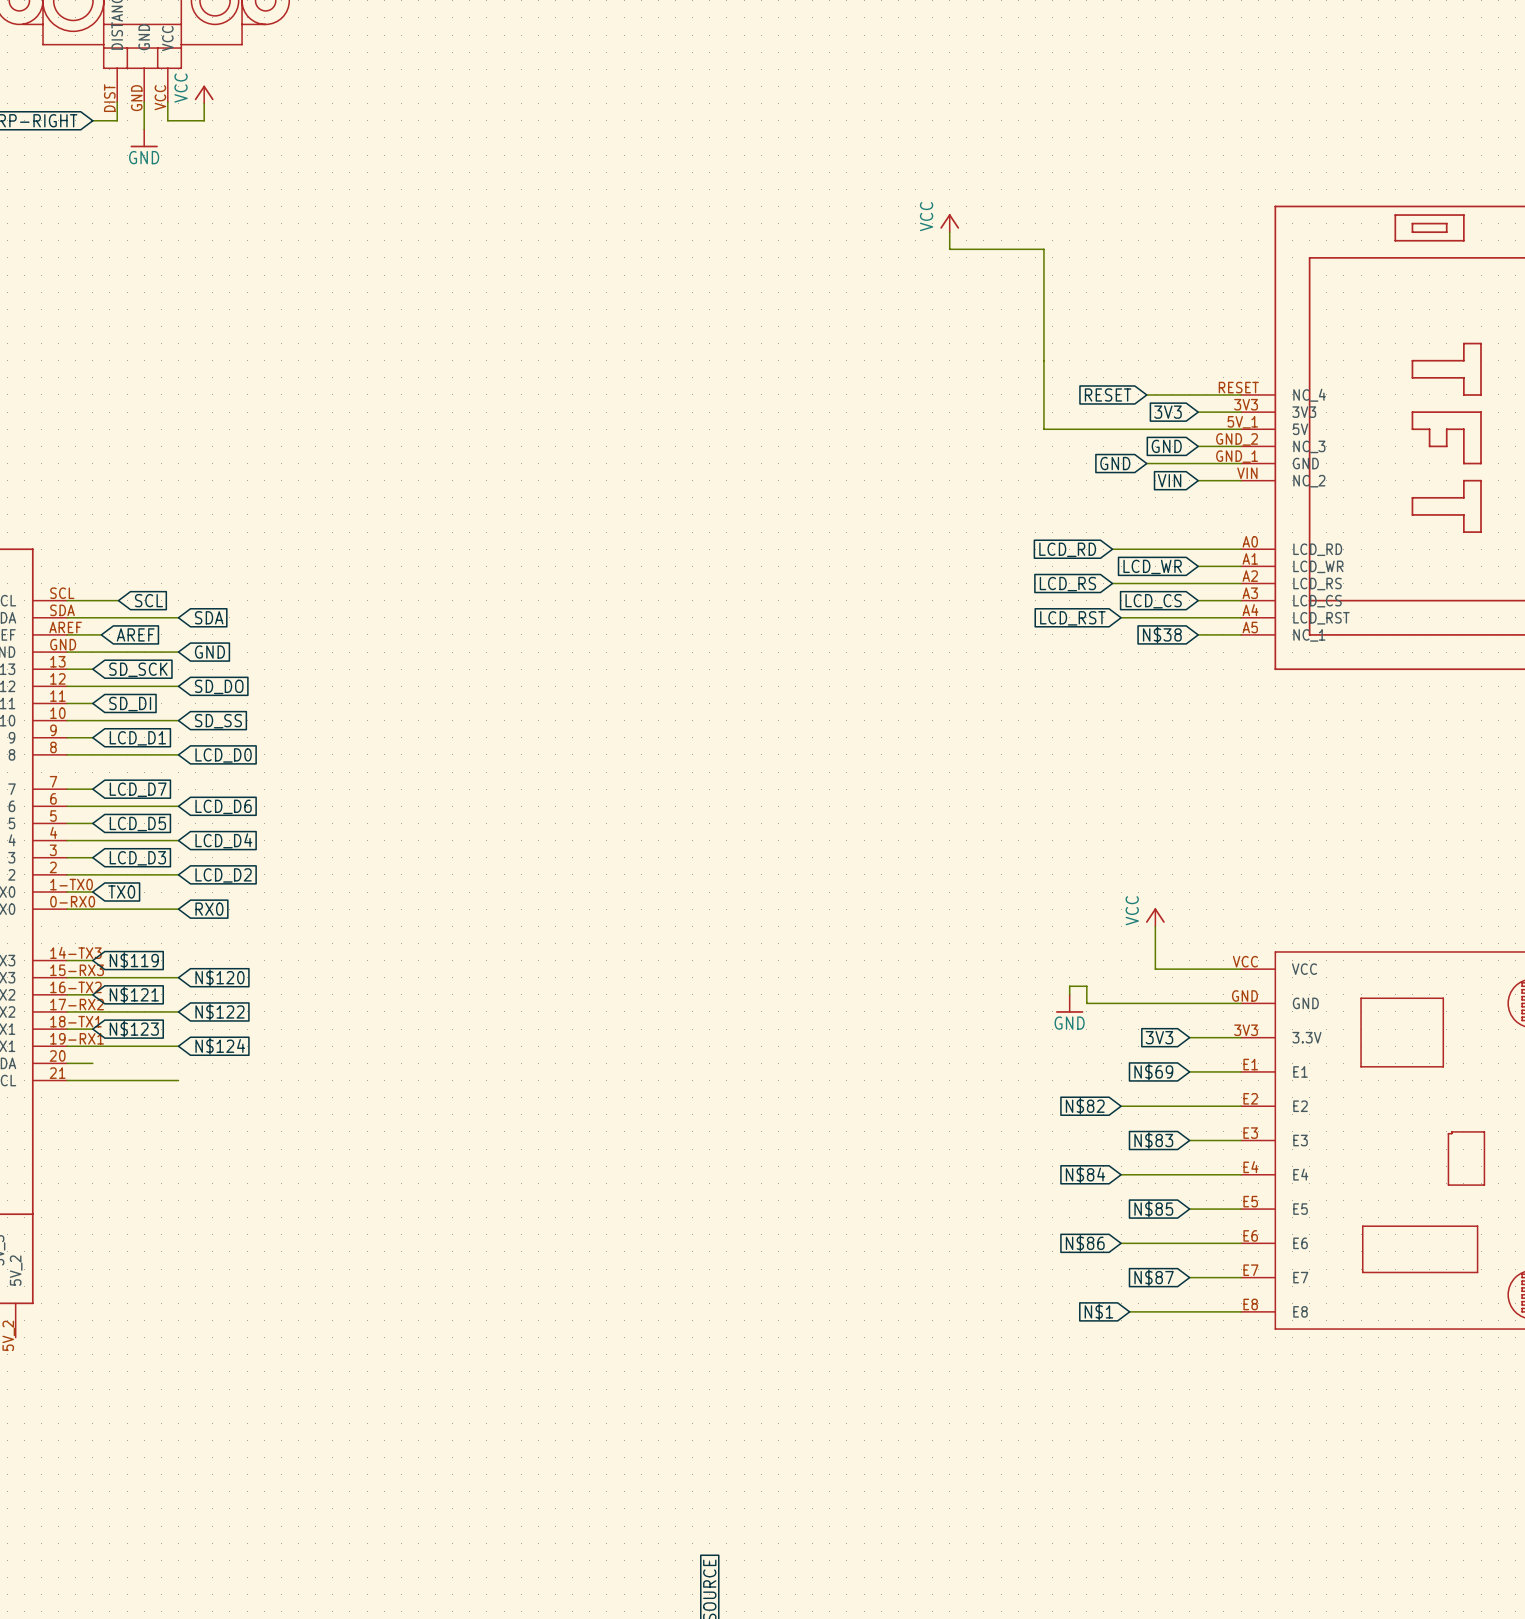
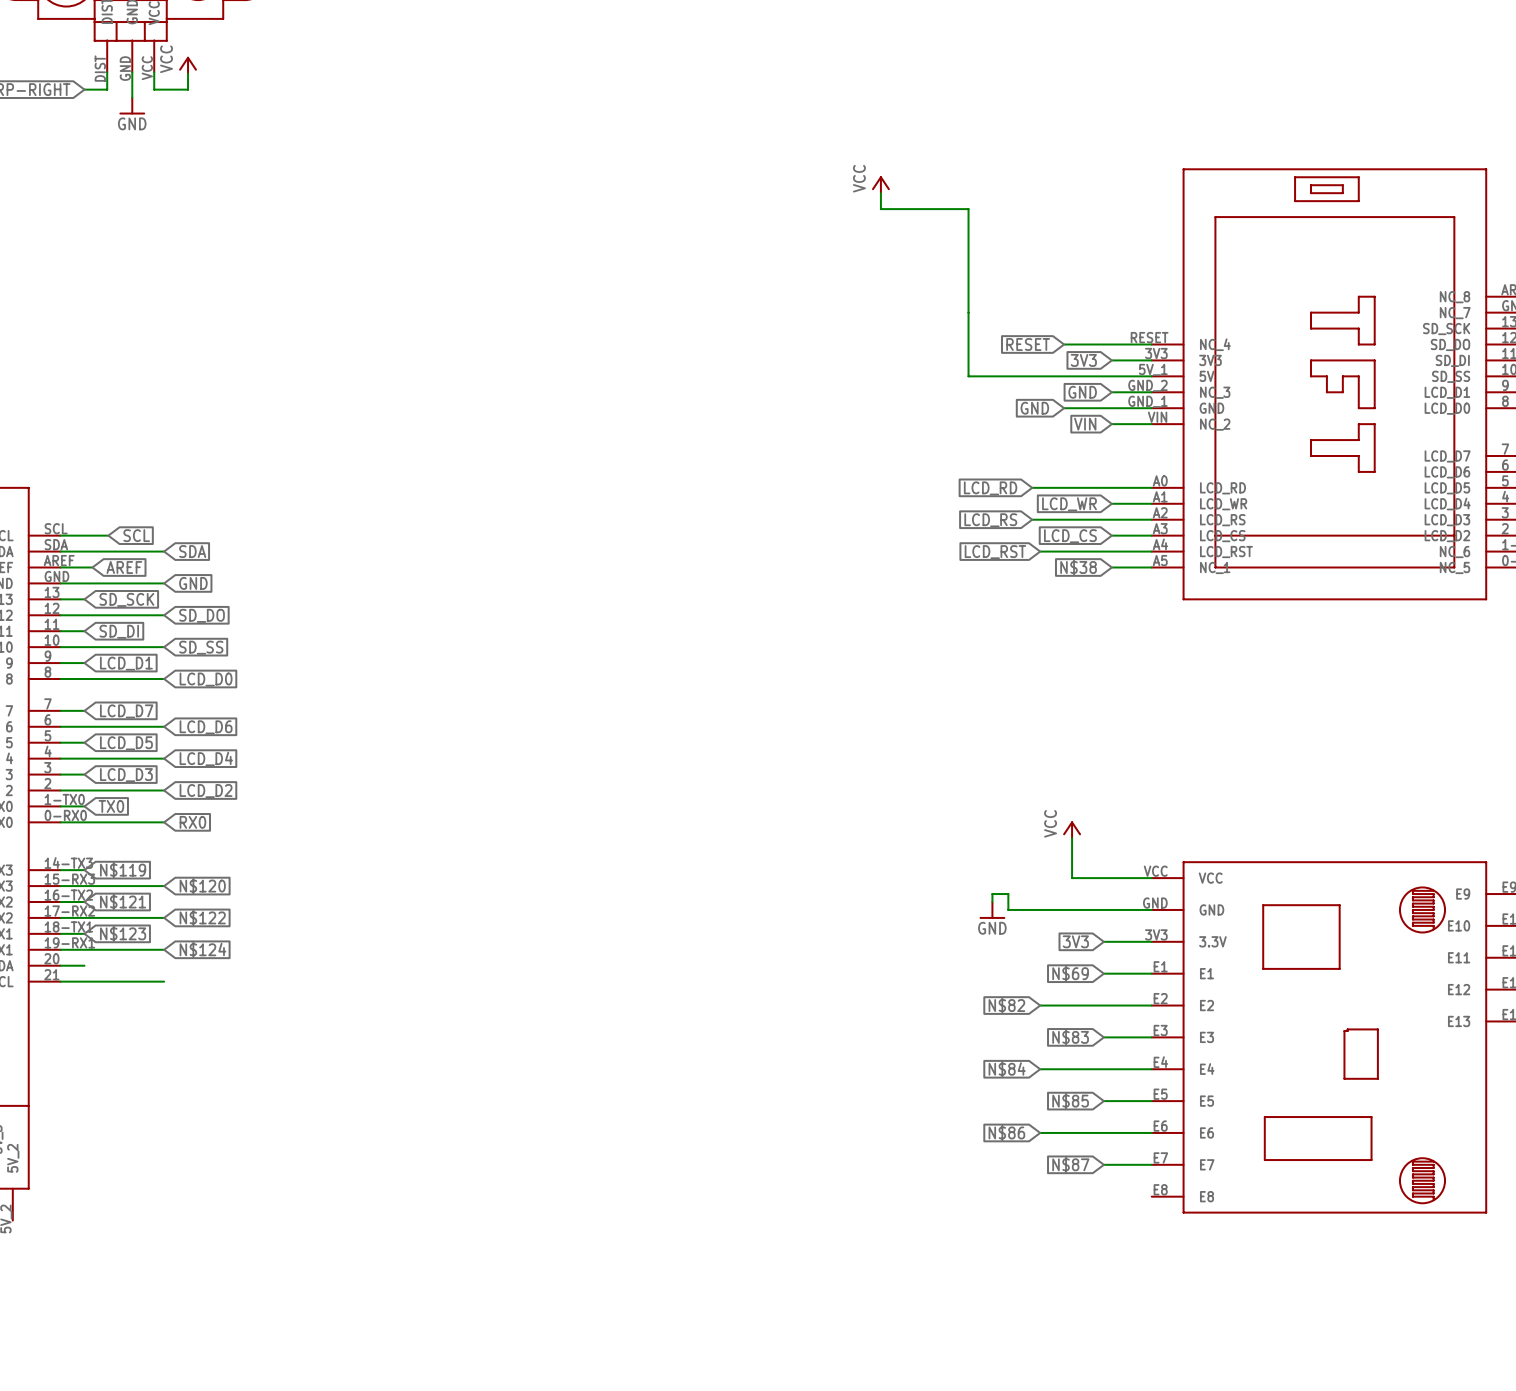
global label: N$1 (1098, 1311) -> none
wire: (1129, 1311) (1241, 1311) -> none

